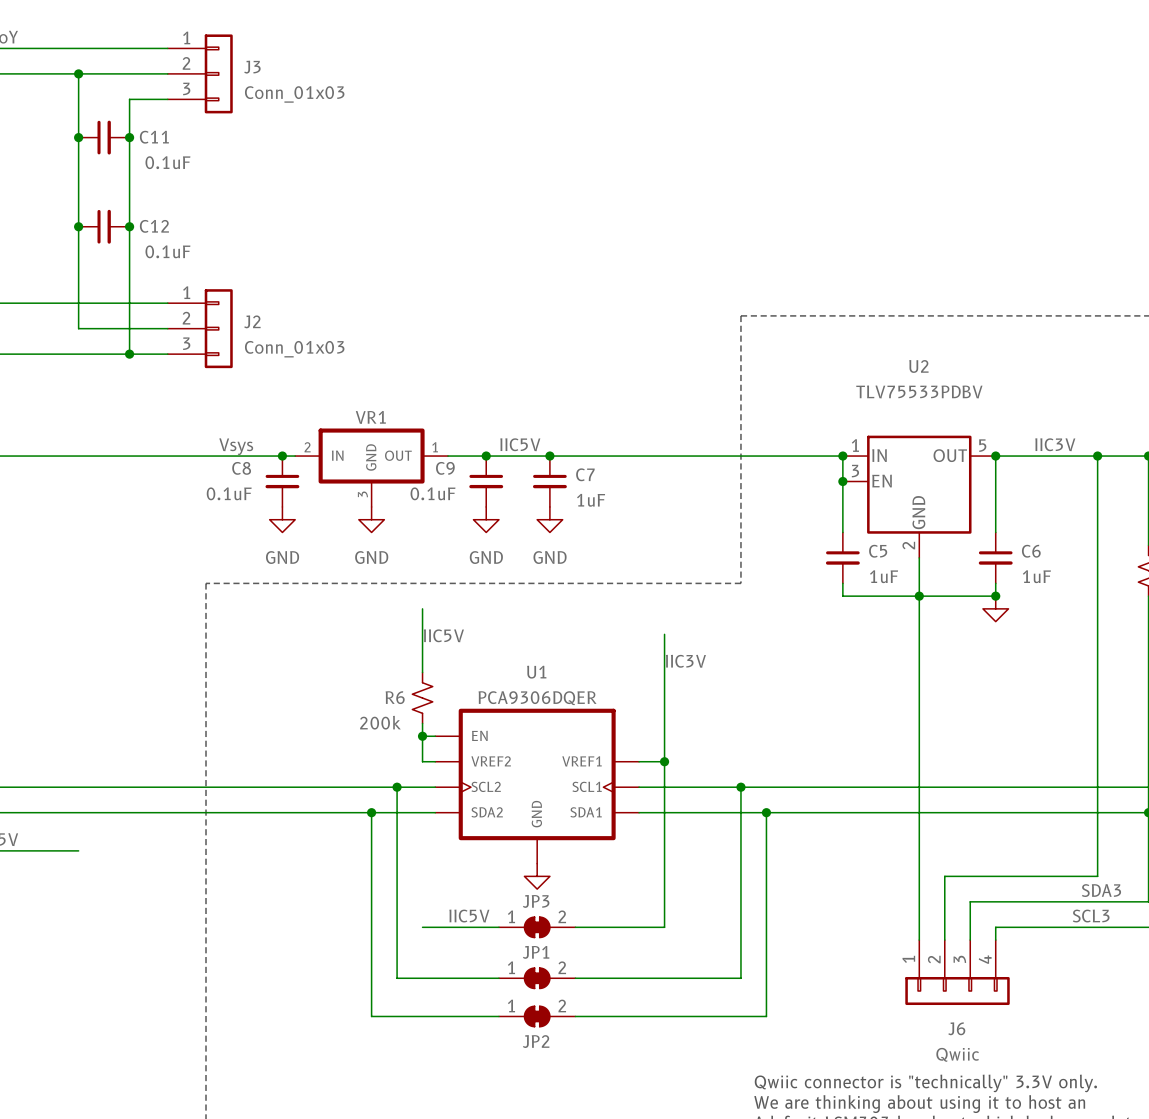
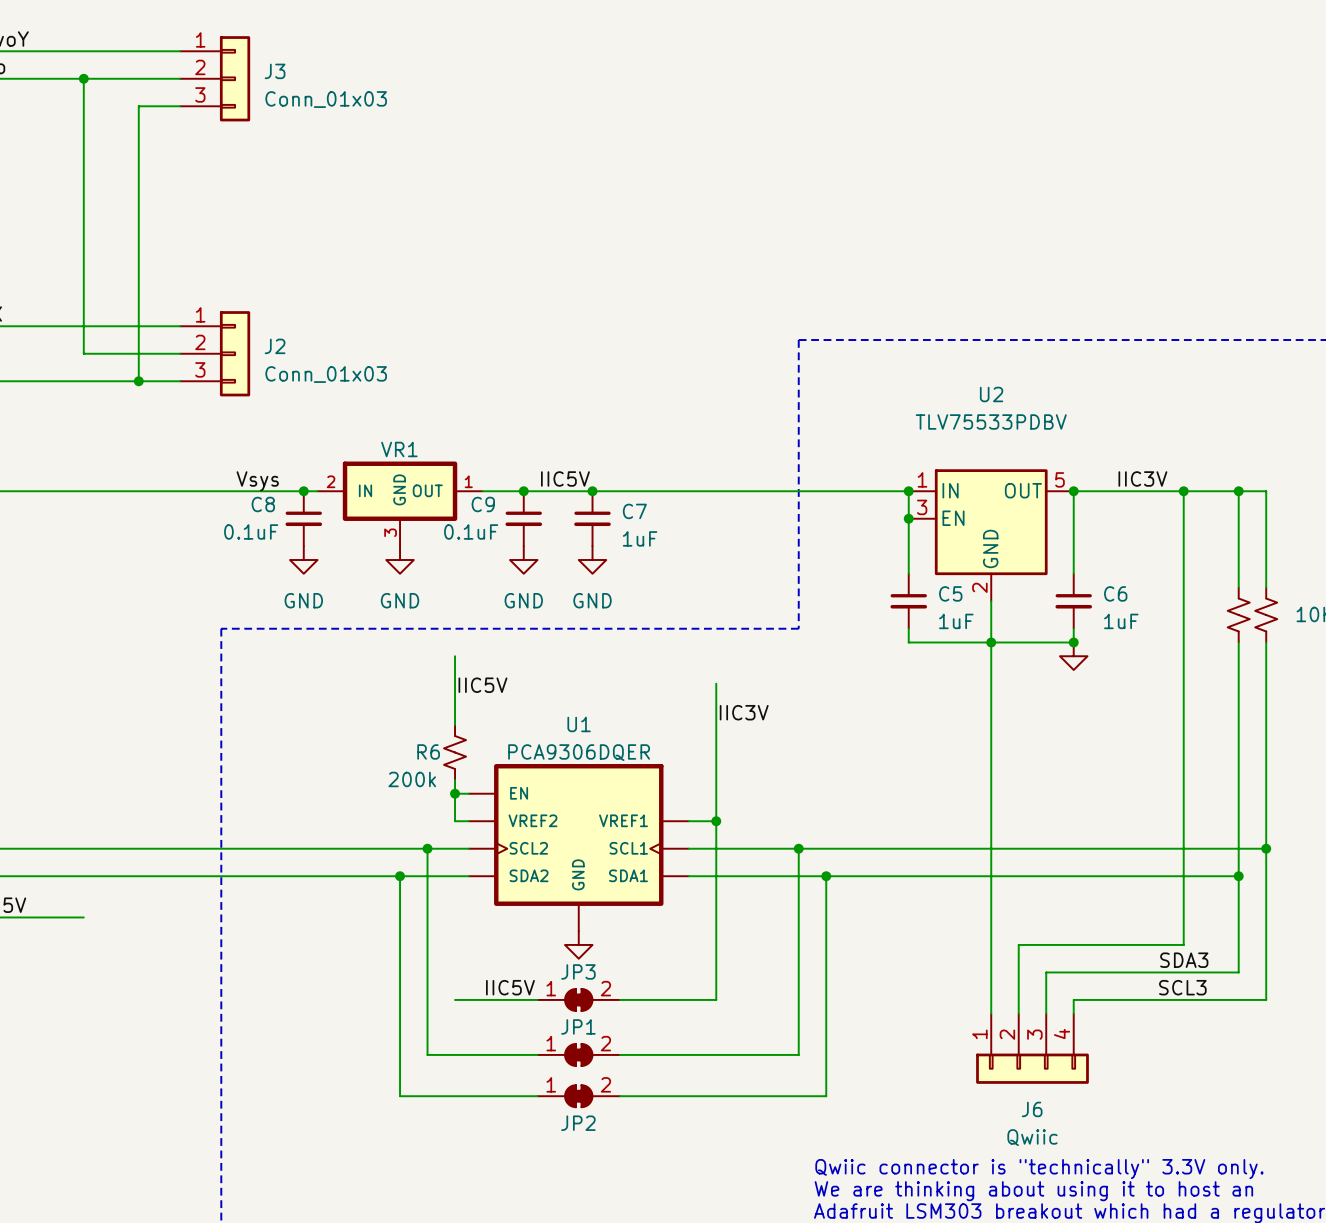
junction: (78, 137) -> none
C11: 0.1uF (104, 137) -> none
junction: (129, 137) -> none
junction: (78, 226) -> none
C12: 0.1uF (104, 226) -> none
junction: (129, 226) -> none

